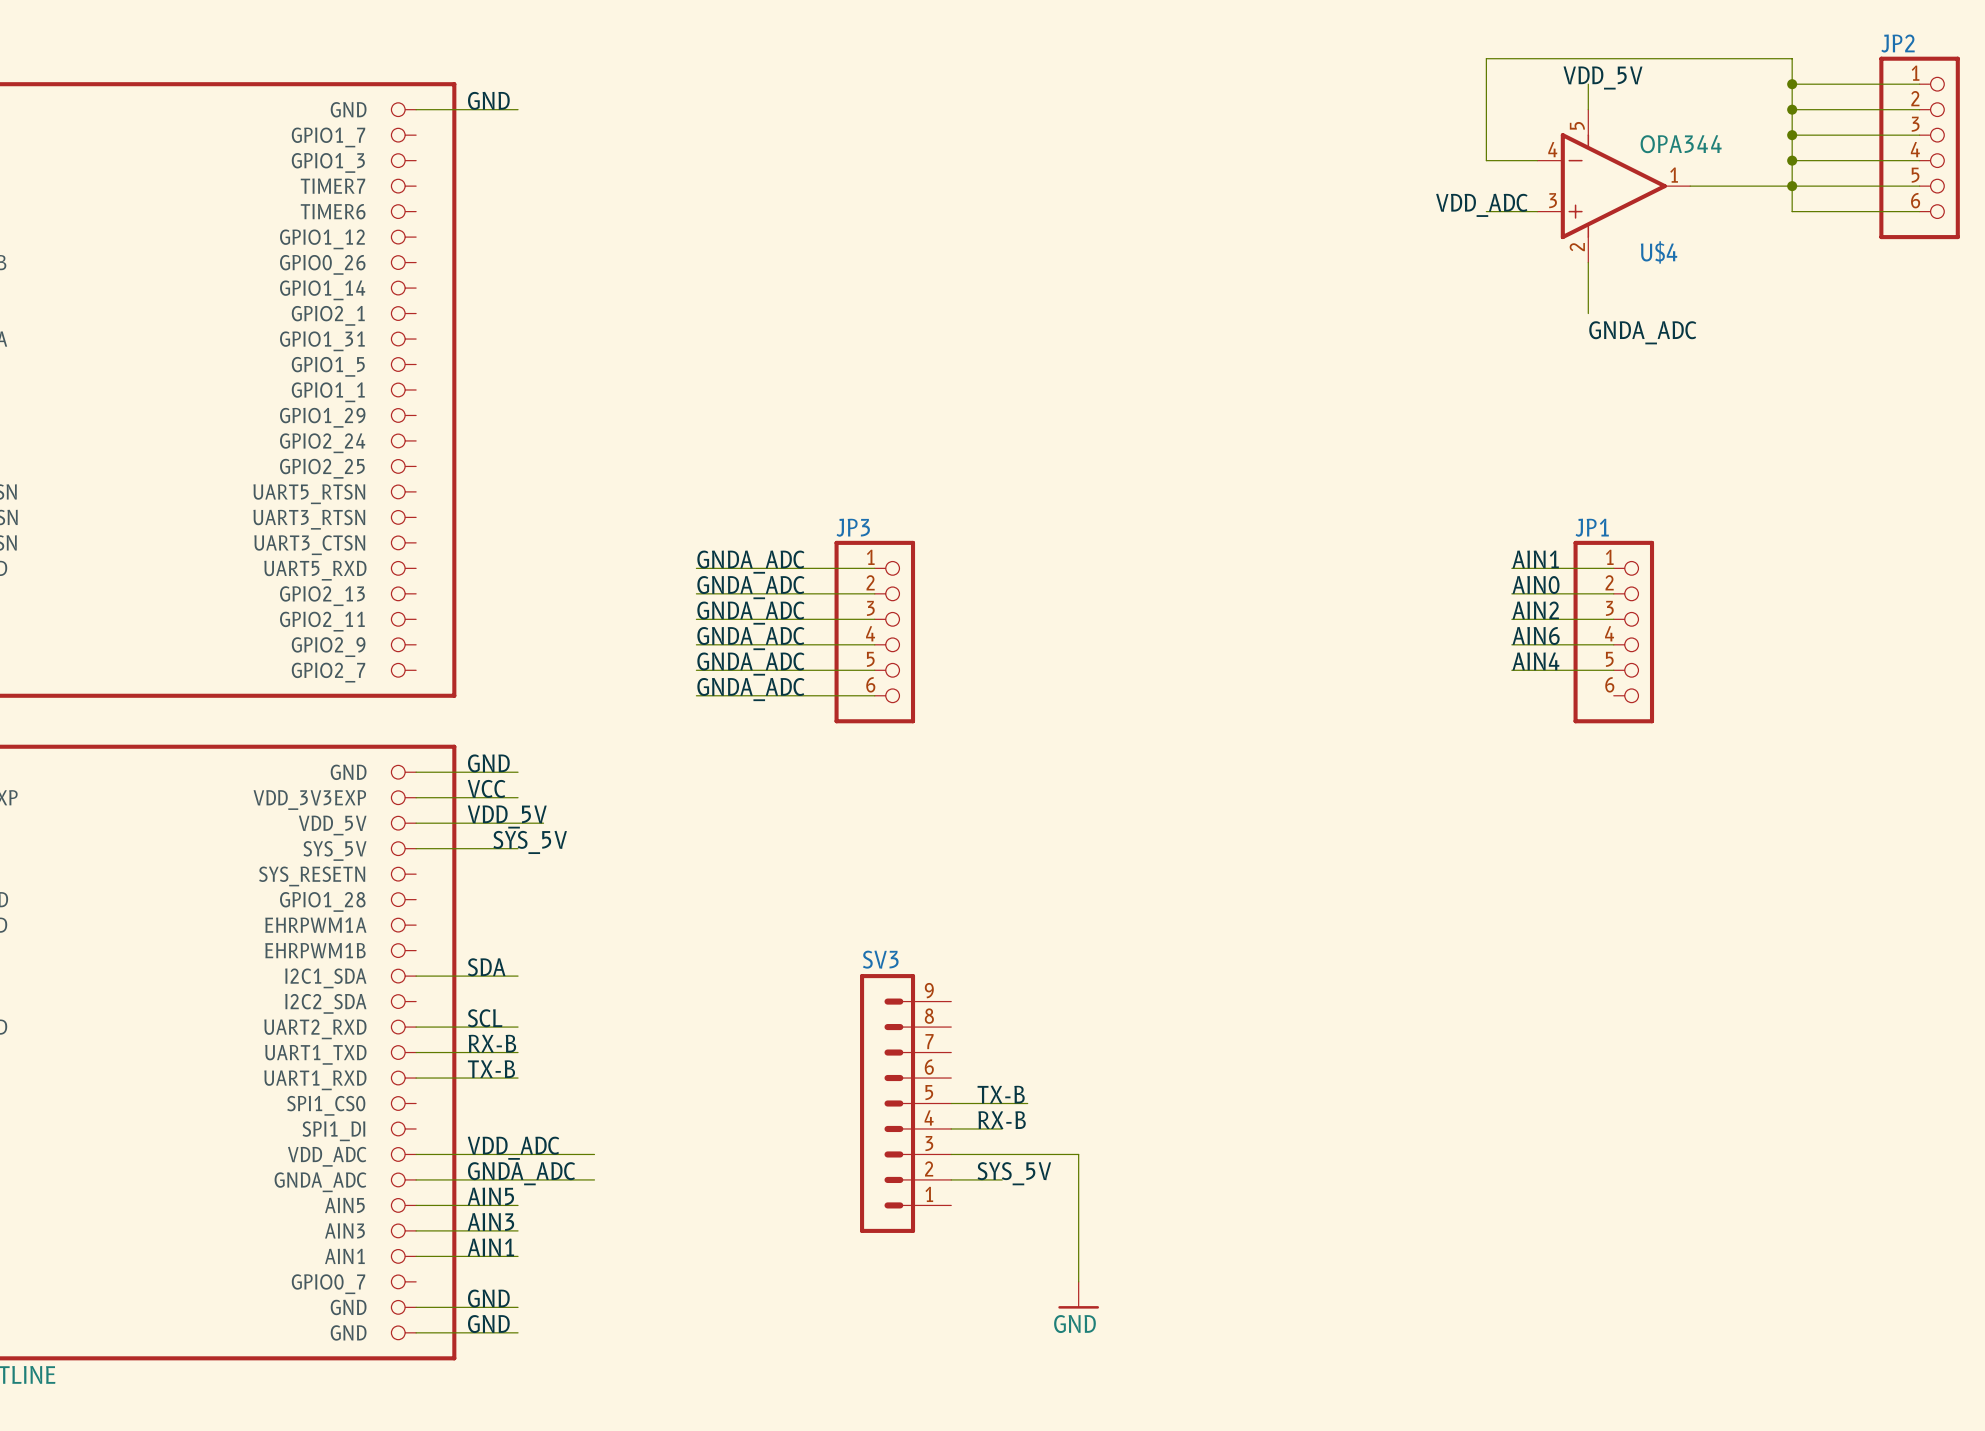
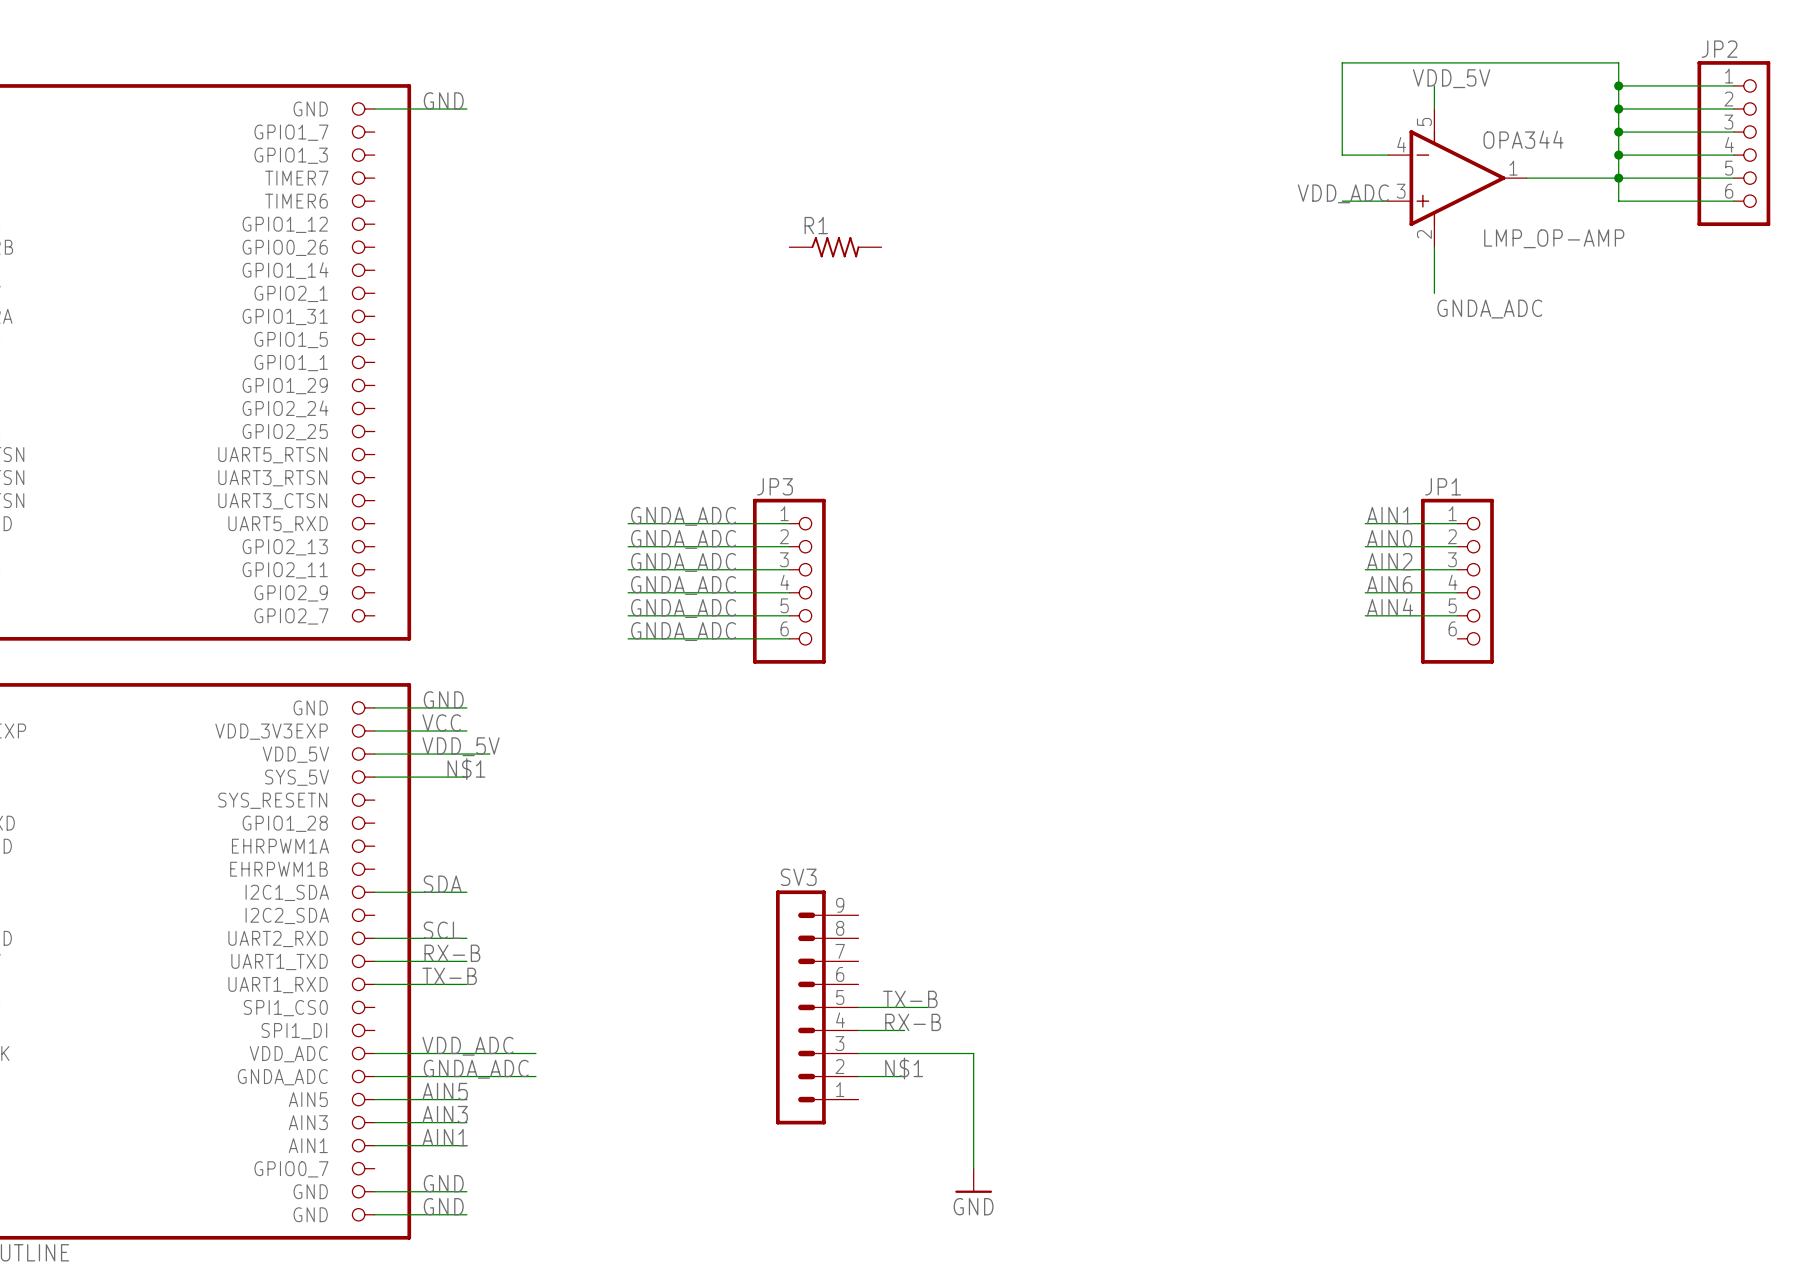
U$4 name: U$4 (1659, 252) -> LMP_OP-AMP (1554, 238)
R1: none -> (835, 247)
label: SYS_5V (530, 842) -> N$1 (466, 769)
label: SYS_5V (1014, 1173) -> N$1 (904, 1068)

